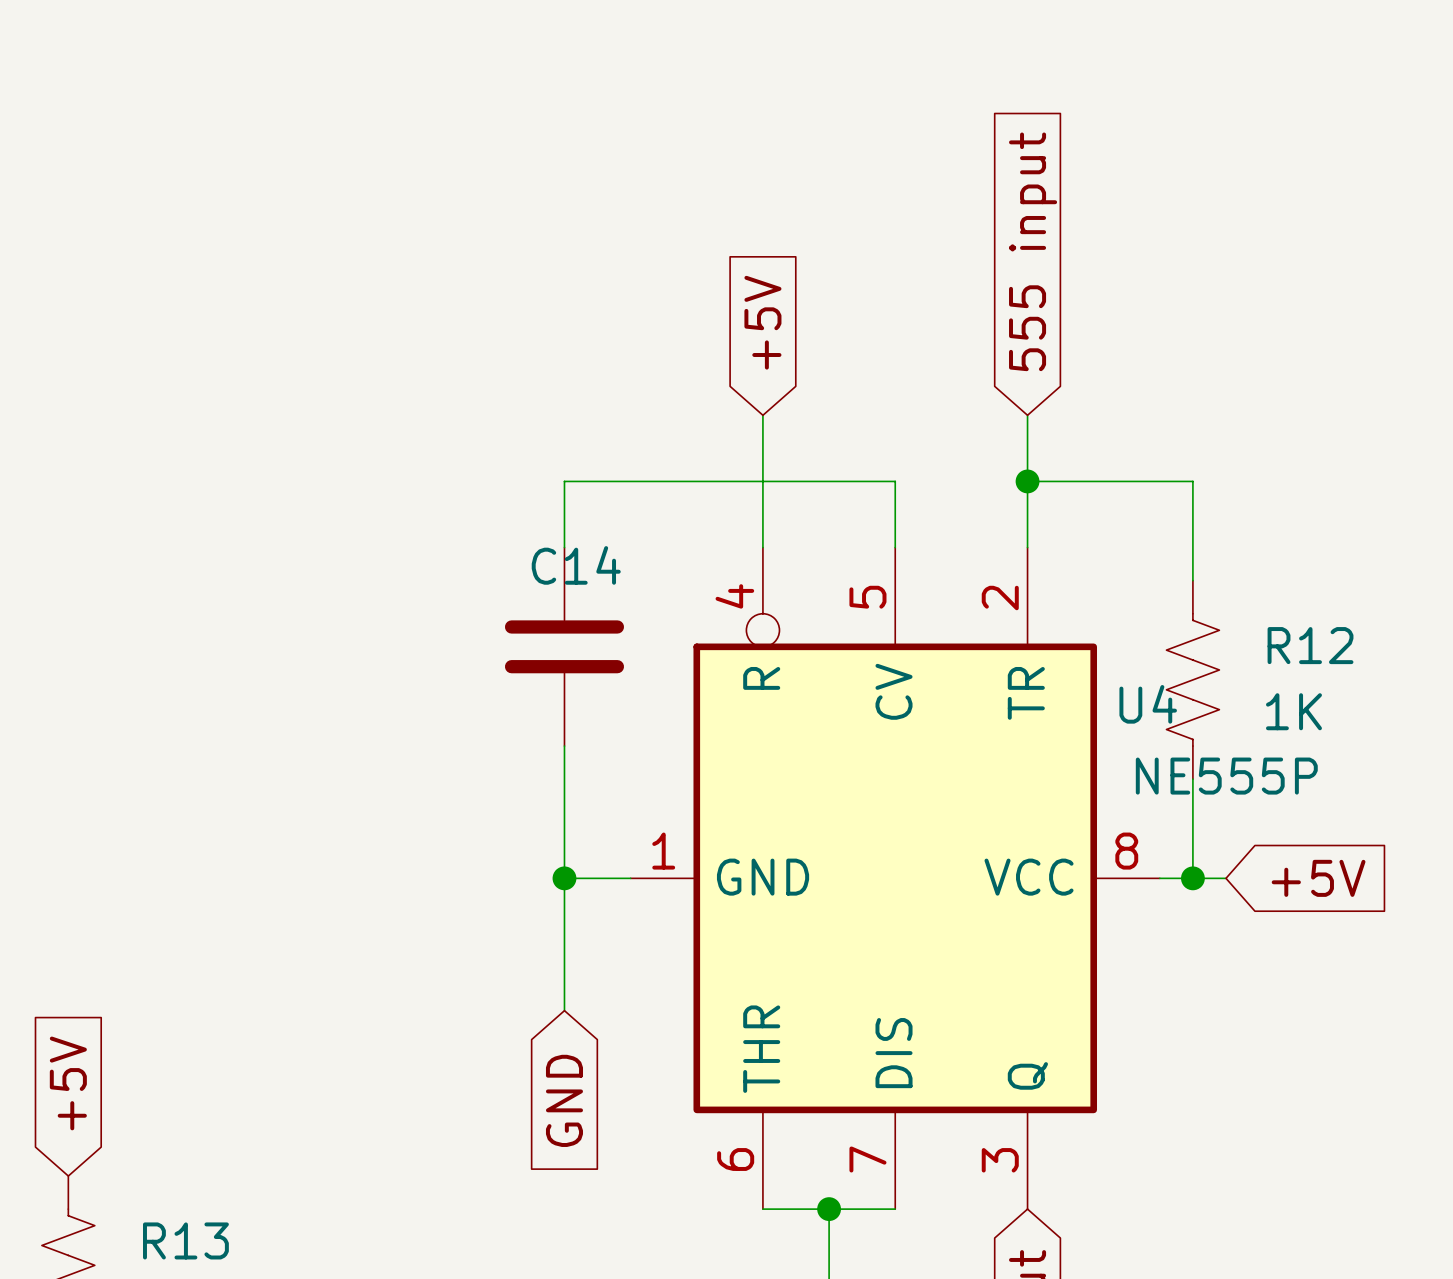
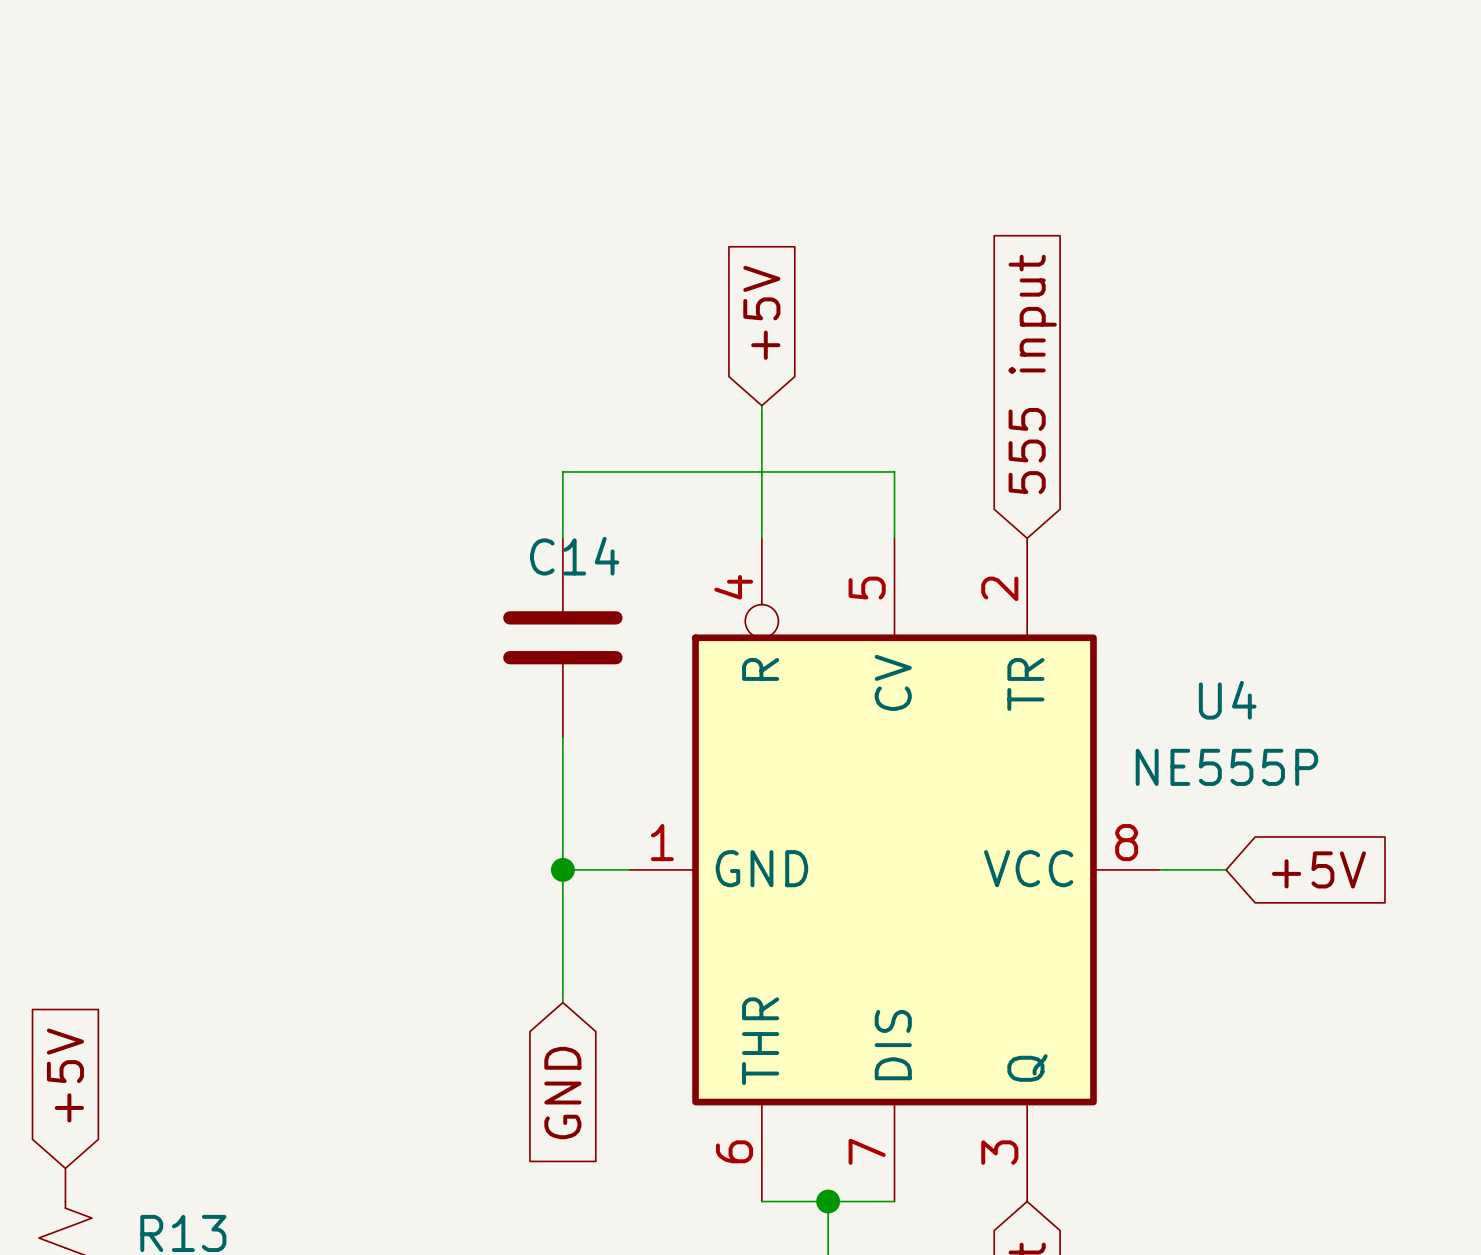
global label position: 555 input (1033, 251) -> 555 input (1032, 374)
wire: (1027, 415) (1027, 547) -> none
wire: (1027, 481) (1192, 481) (1192, 580) -> none
junction: (1027, 481) -> none
R12: 1K (1192, 679) -> none
U4 name position: U4 (1148, 704) -> U4 (1227, 700)
wire: (1192, 779) (1192, 878) -> none
junction: (1192, 878) -> none

